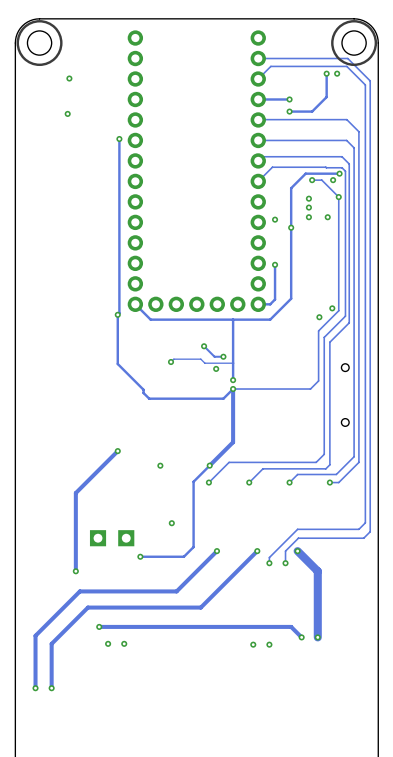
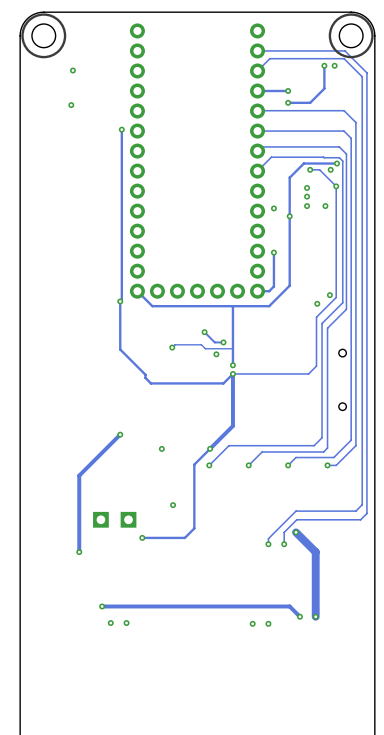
track: (216, 551) (176, 591) (79, 591) (35, 635) (35, 688) -> none
via: (216, 551) -> none
track: (257, 551) (200, 607) (87, 607) (51, 643) (51, 688) -> none
via: (257, 551) -> none
via: (35, 688) -> none
via: (51, 688) -> none

